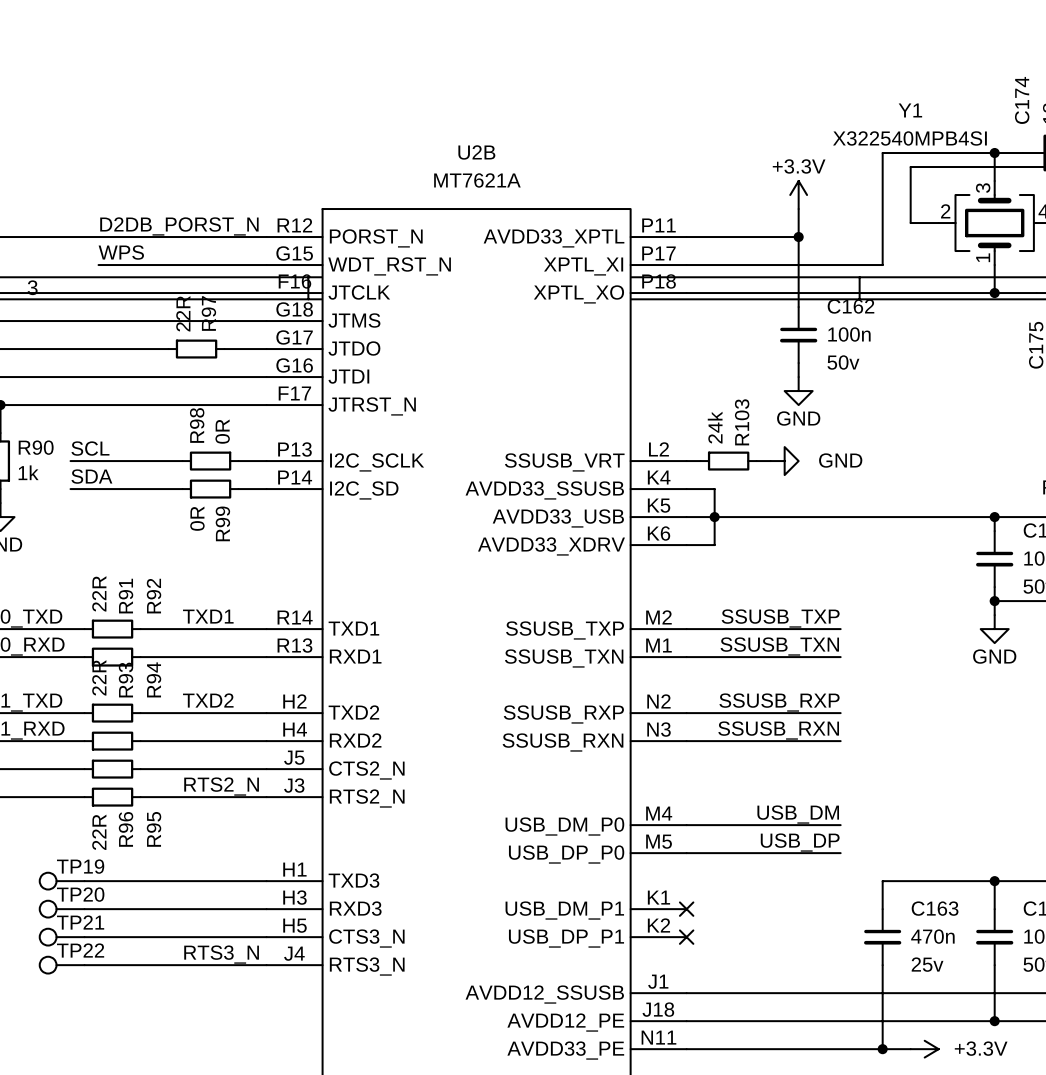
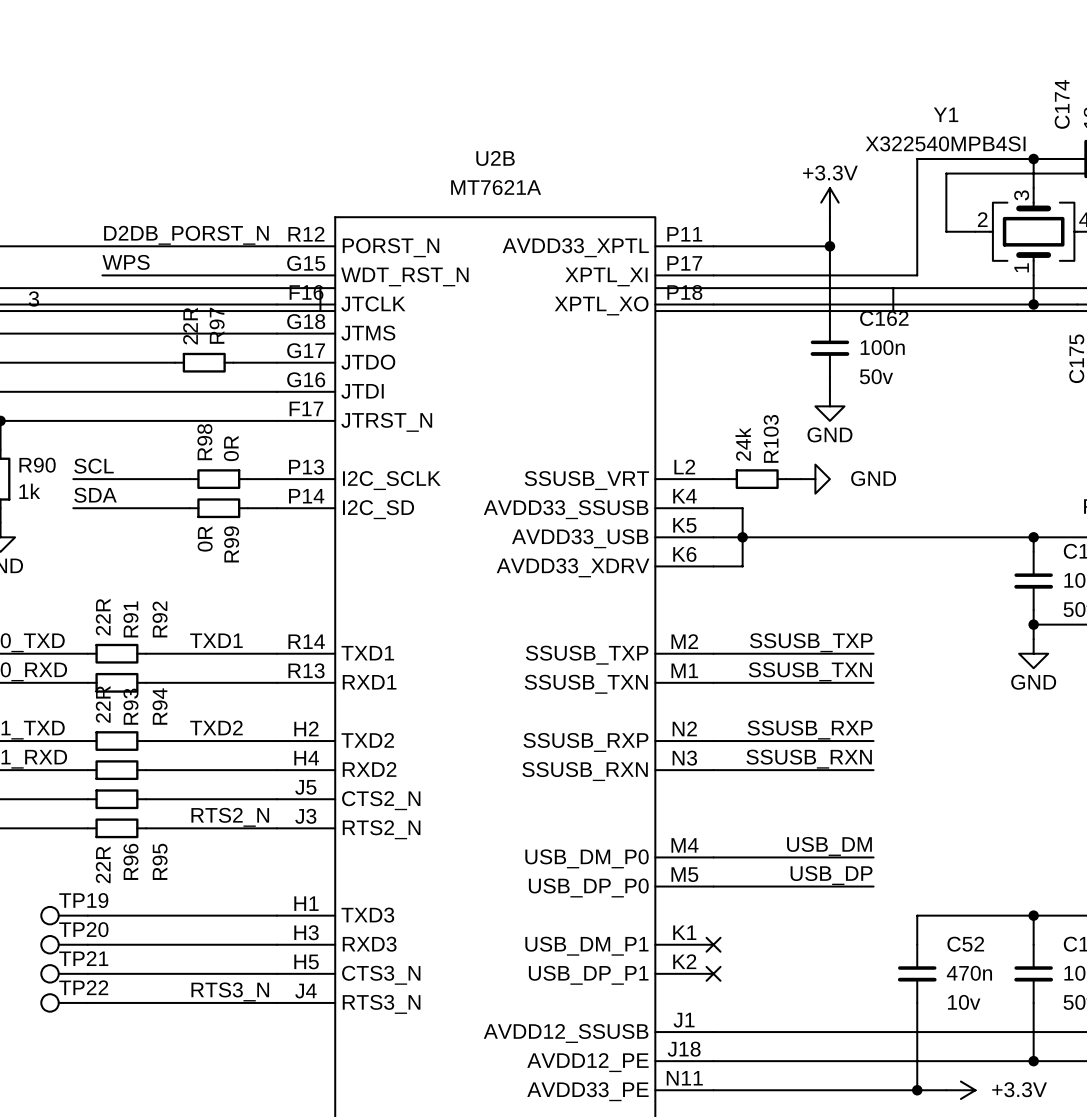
C163 name: C163 (935, 908) -> C52 (965, 944)
C163 text: 25v (927, 964) -> 10v (964, 1002)

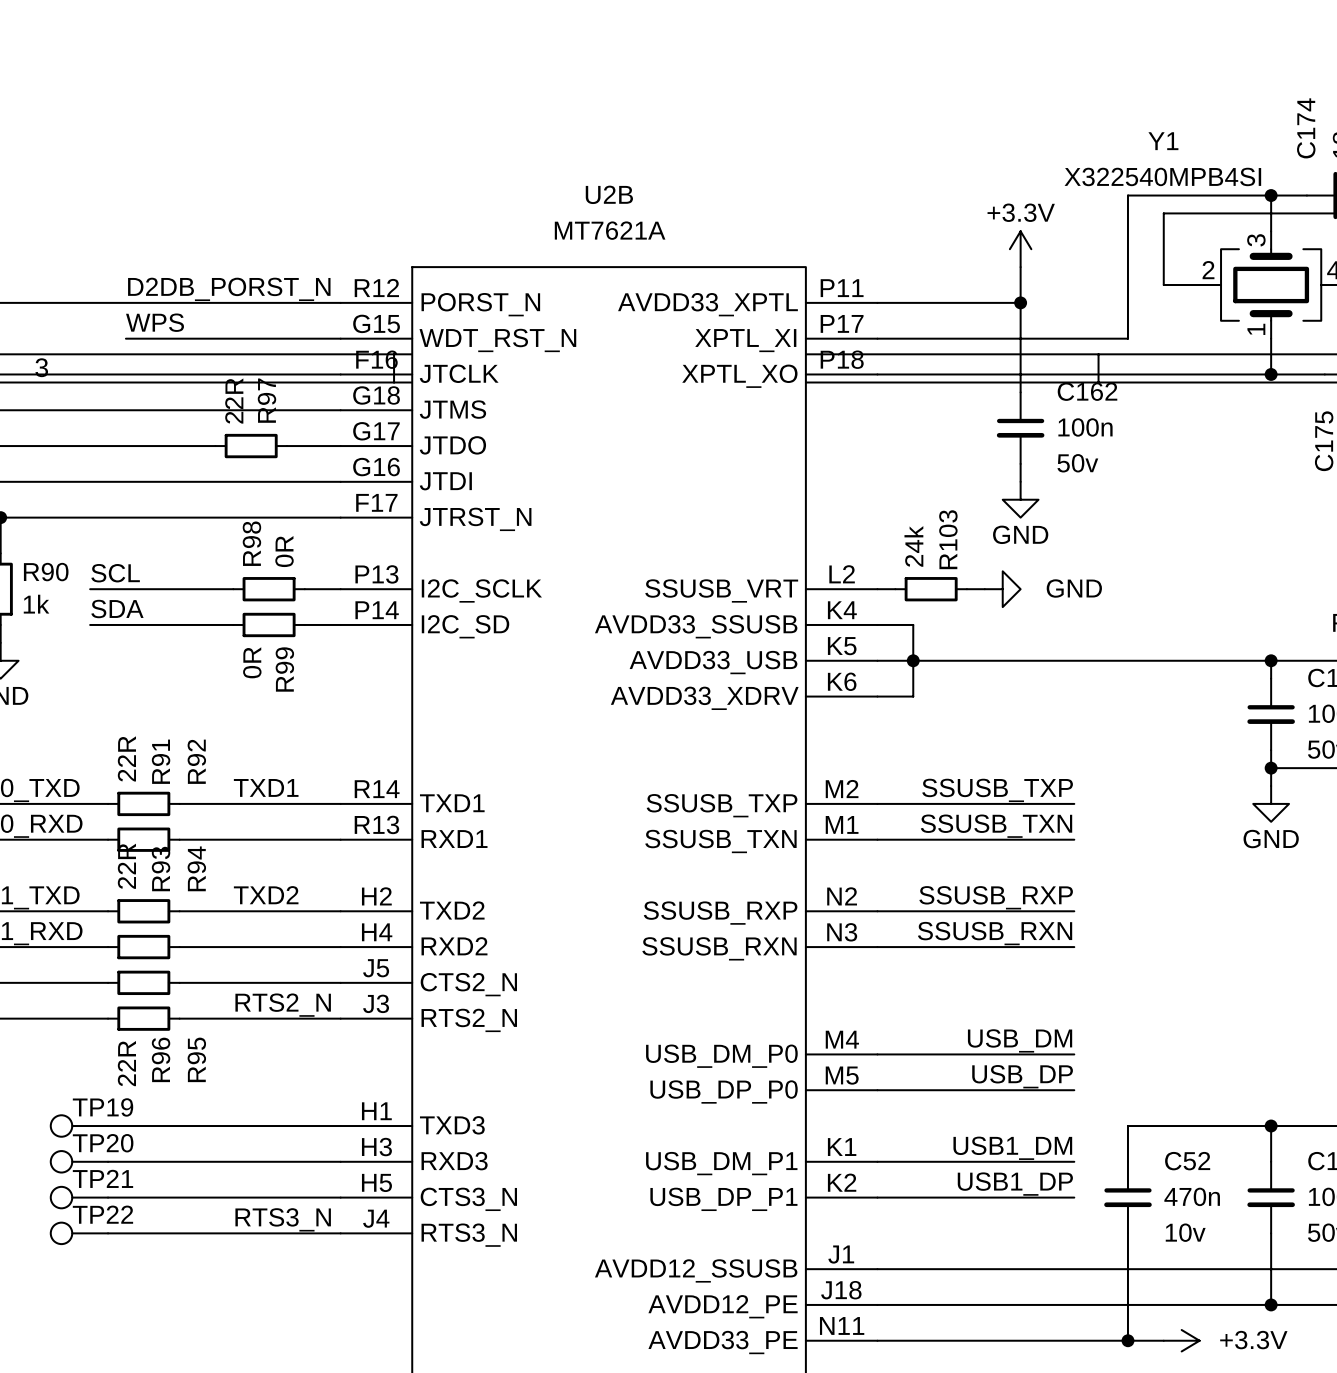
label: none -> USB1_DM (1012, 1148)
wire: none -> (877, 1161) (1074, 1161)
no-connect mark: (713, 944) -> none
label: none -> USB1_DP (1015, 1184)
wire: none -> (877, 1197) (1074, 1197)
no-connect mark: (713, 973) -> none

